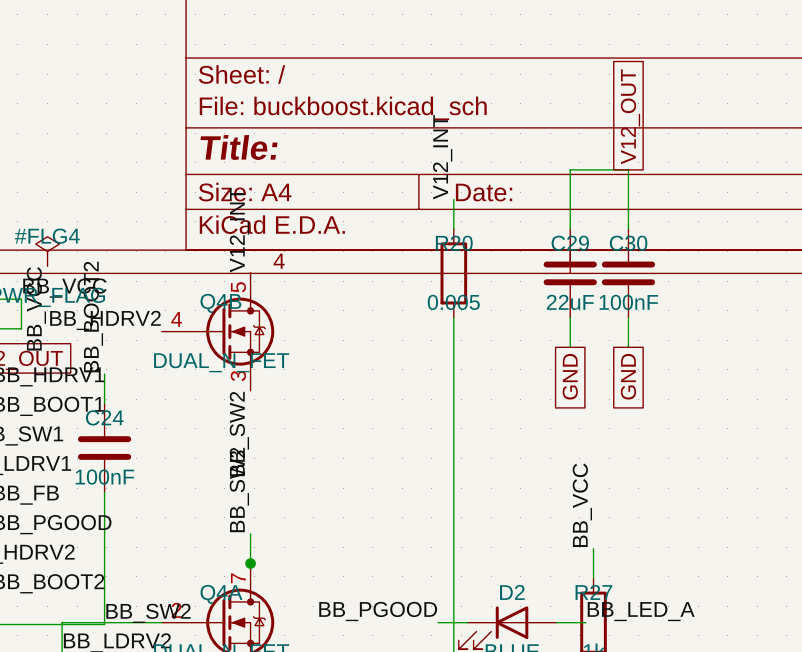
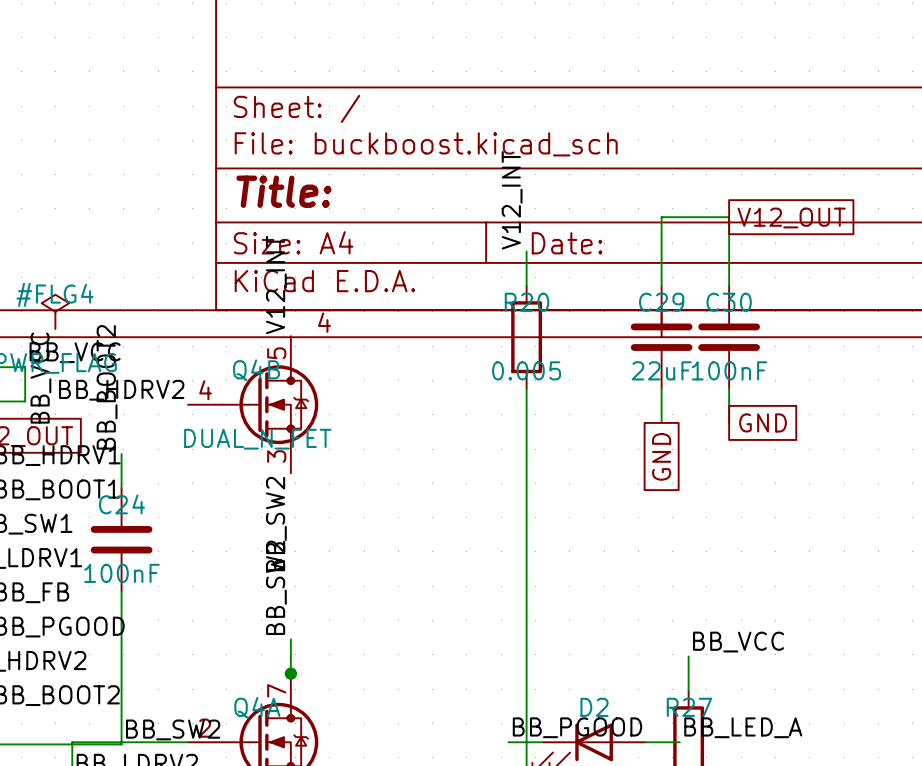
global label rotation: 0° (630, 116) -> 90° clockwise (791, 218)
global label rotation: 0° (628, 376) -> 90° counterclockwise (763, 422)
label rotation: 0° (582, 505) -> 90° clockwise (738, 642)
label position: BB_PGOOD (378, 611) -> BB_PGOOD (577, 727)

